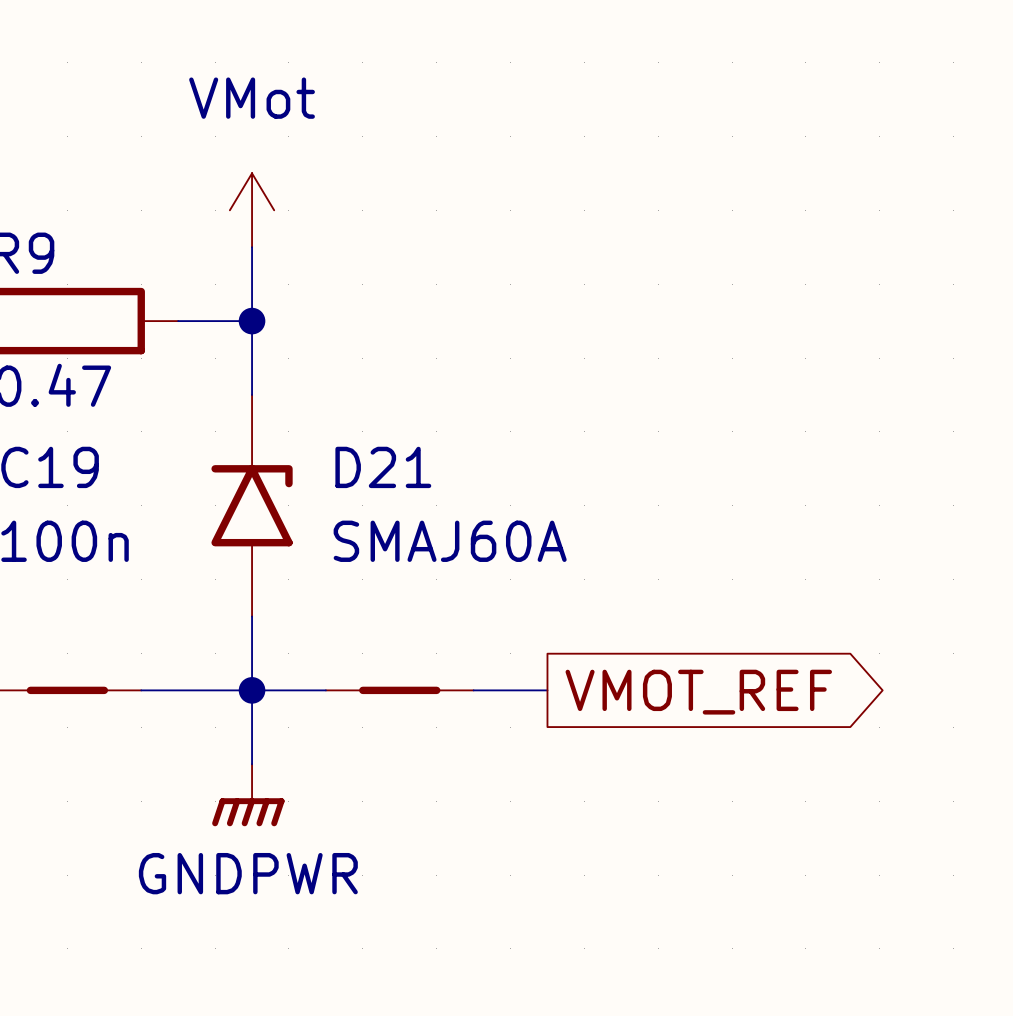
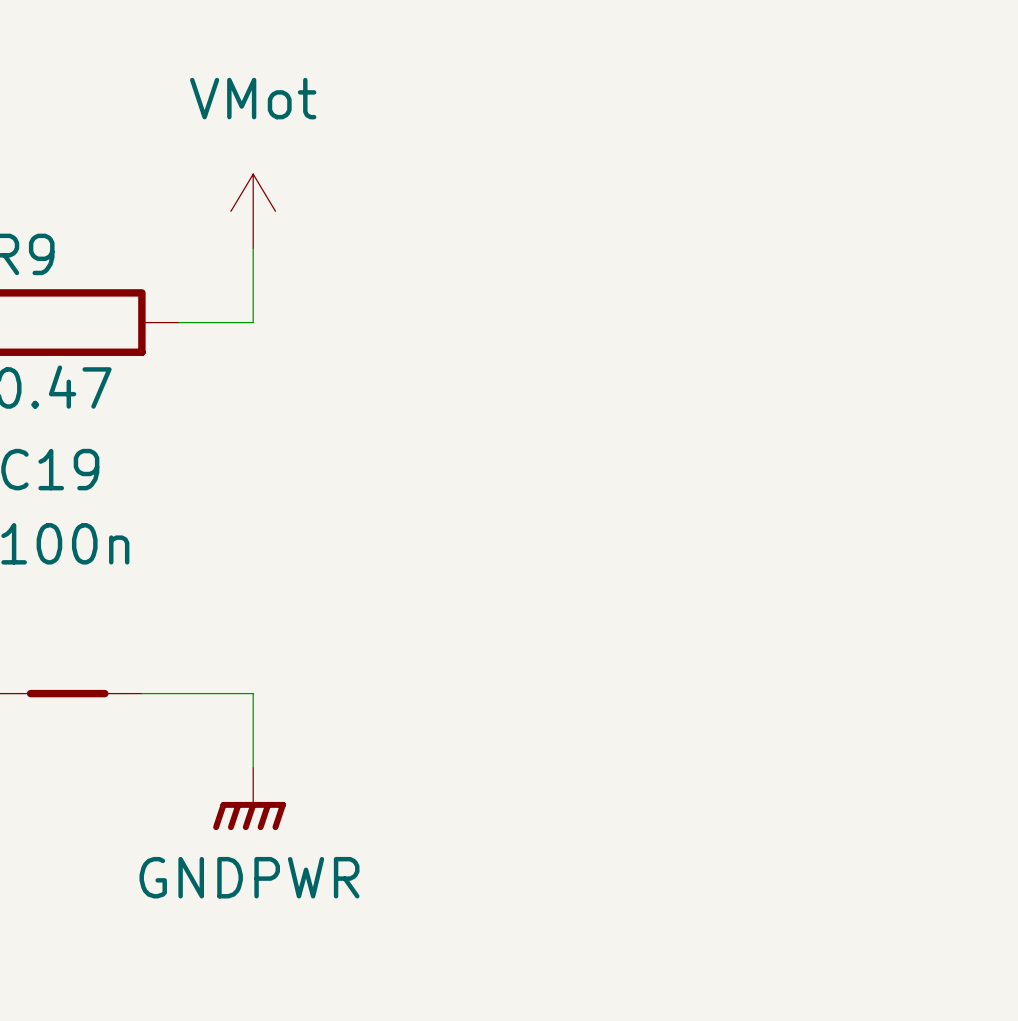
wire: (252, 321) (252, 394) -> none
junction: (252, 321) -> none
D21: SMAJ60A (252, 505) -> none
wire: (252, 616) (252, 690) (325, 690) -> none
junction: (252, 690) -> none
part: (399, 690) -> none
wire: (473, 690) (547, 690) -> none
global label: VMOT_REF (698, 692) -> none

